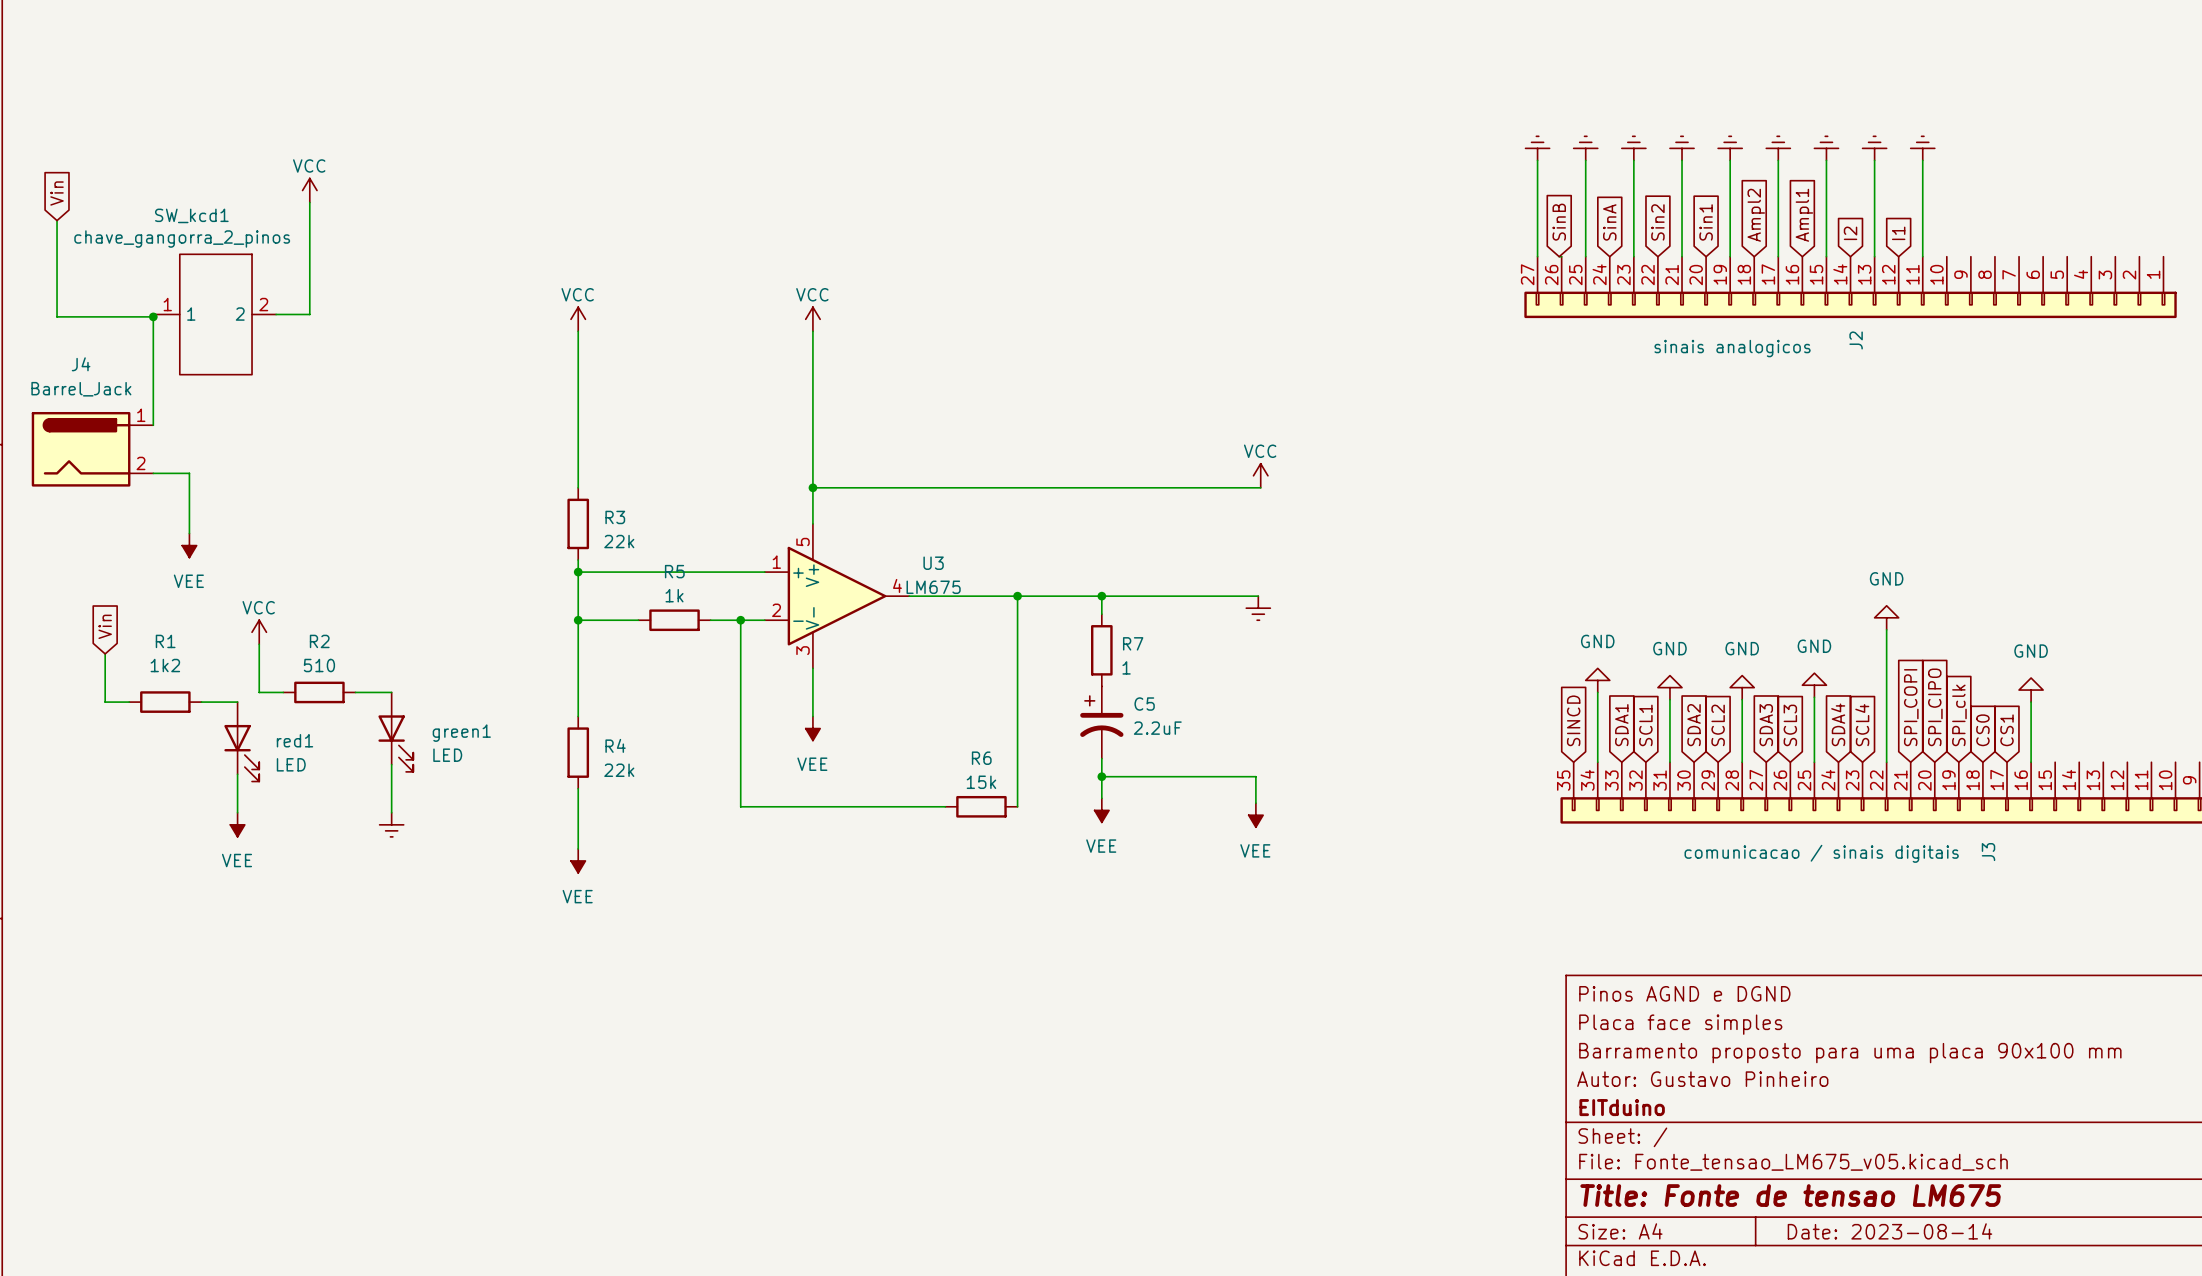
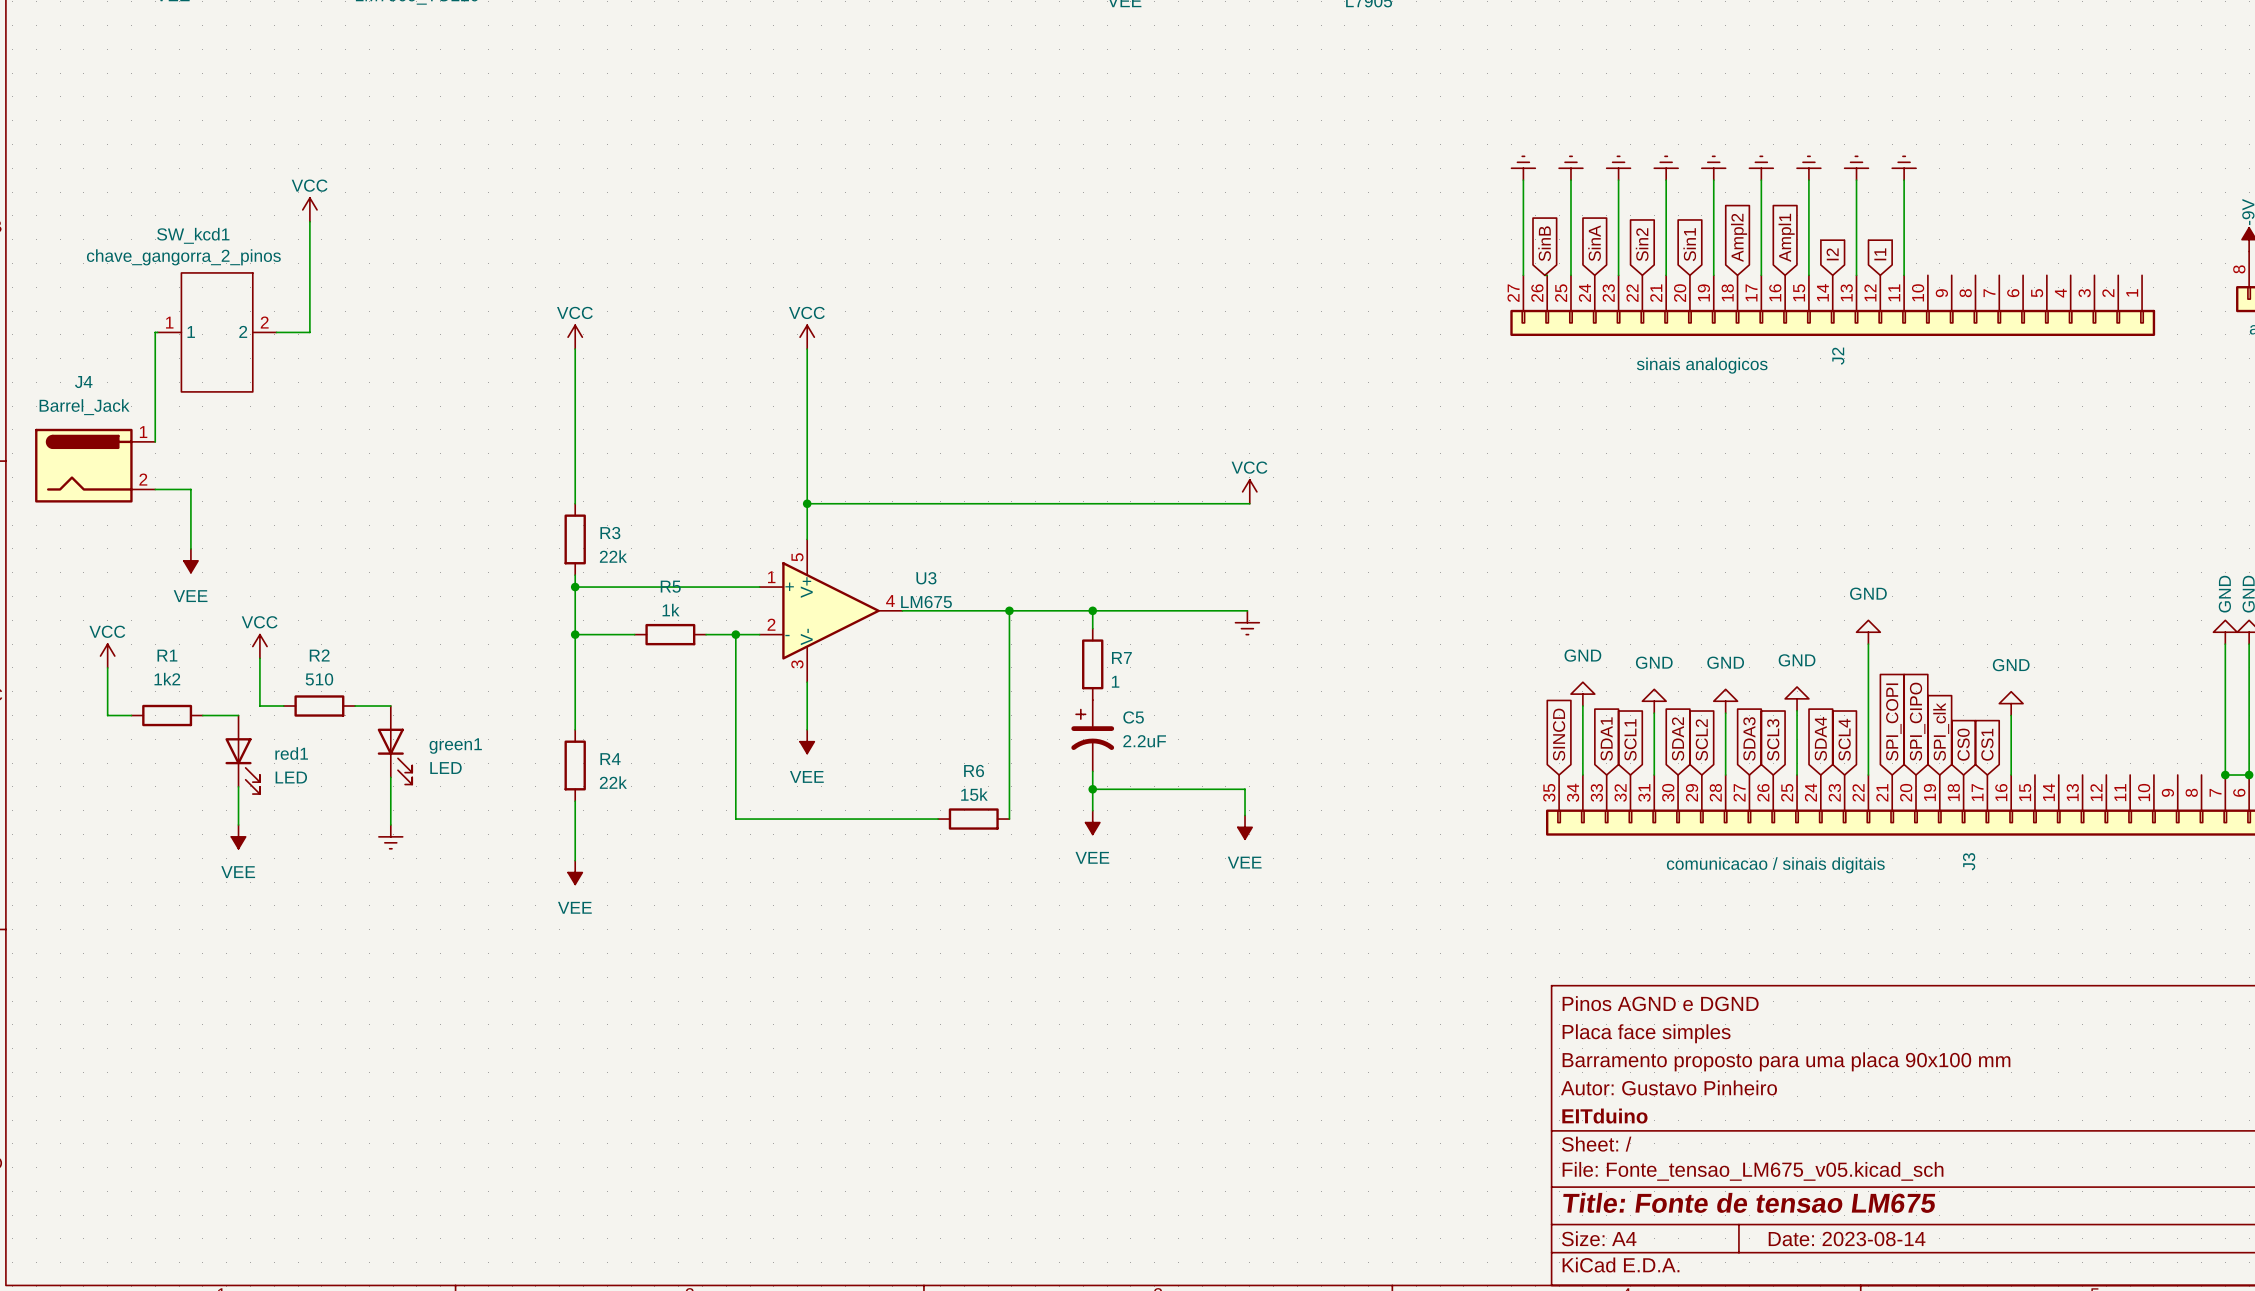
global label: Vin (57, 193) -> none
wire: (57, 220) (57, 316) (153, 316) -> none
junction: (153, 316) -> none
global label: Vin (105, 626) -> none
power symbol: none -> VCC (107, 656)

